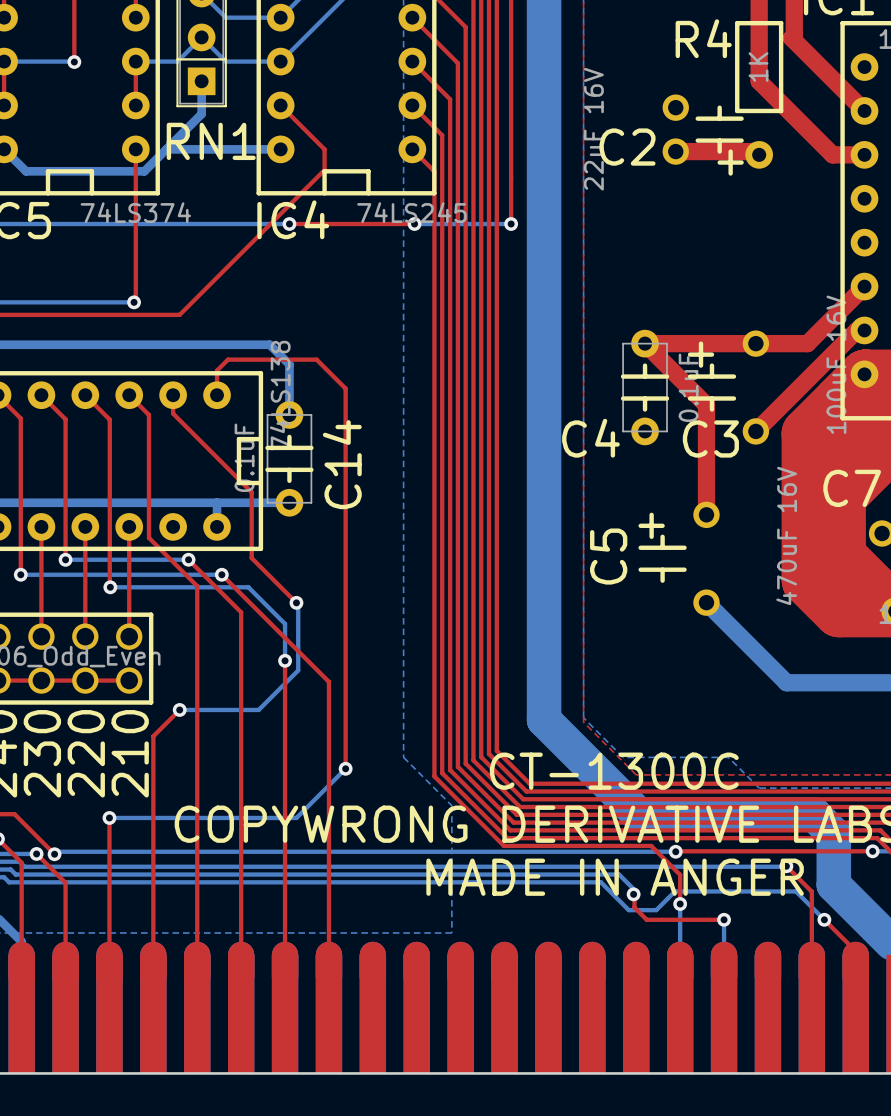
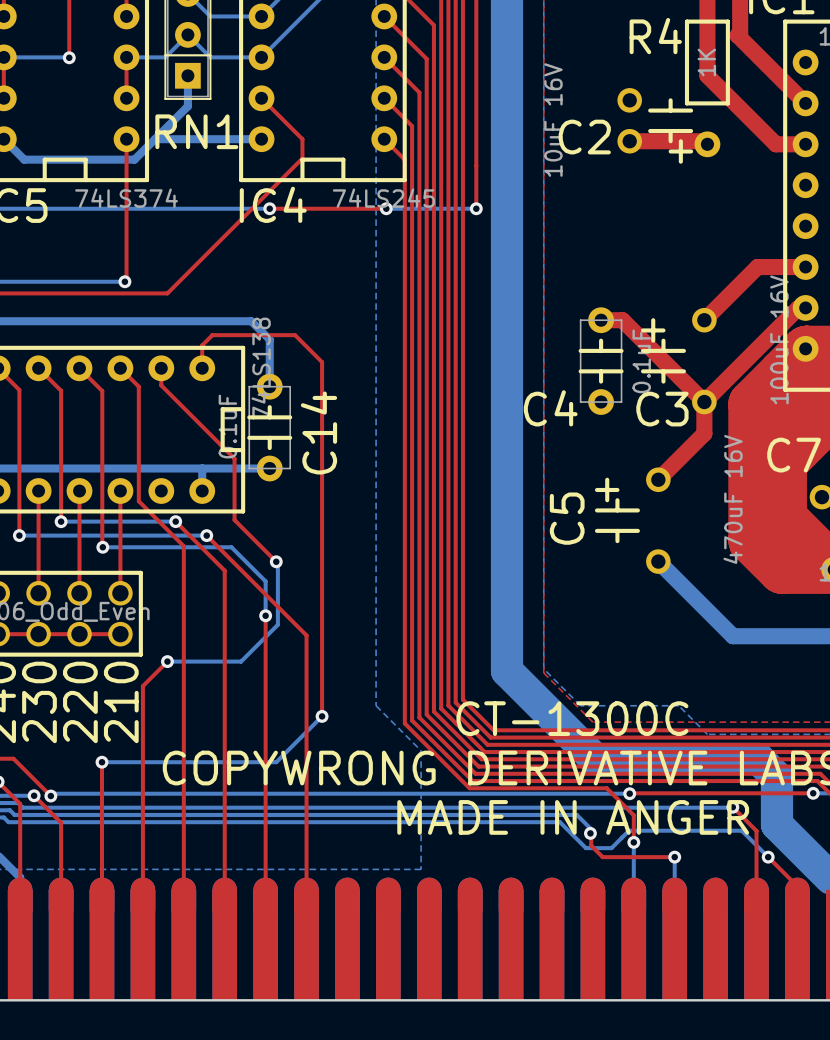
C2 value: 22uF 16V (593, 129) -> 10uF 16V (553, 120)
top track: (864, 286) (807, 343) (668, 343) -> (805, 267) (757, 267) (704, 320)
top track: (645, 343) (706, 405) (706, 514) -> (622, 320) (704, 402) (704, 433) (658, 479)

